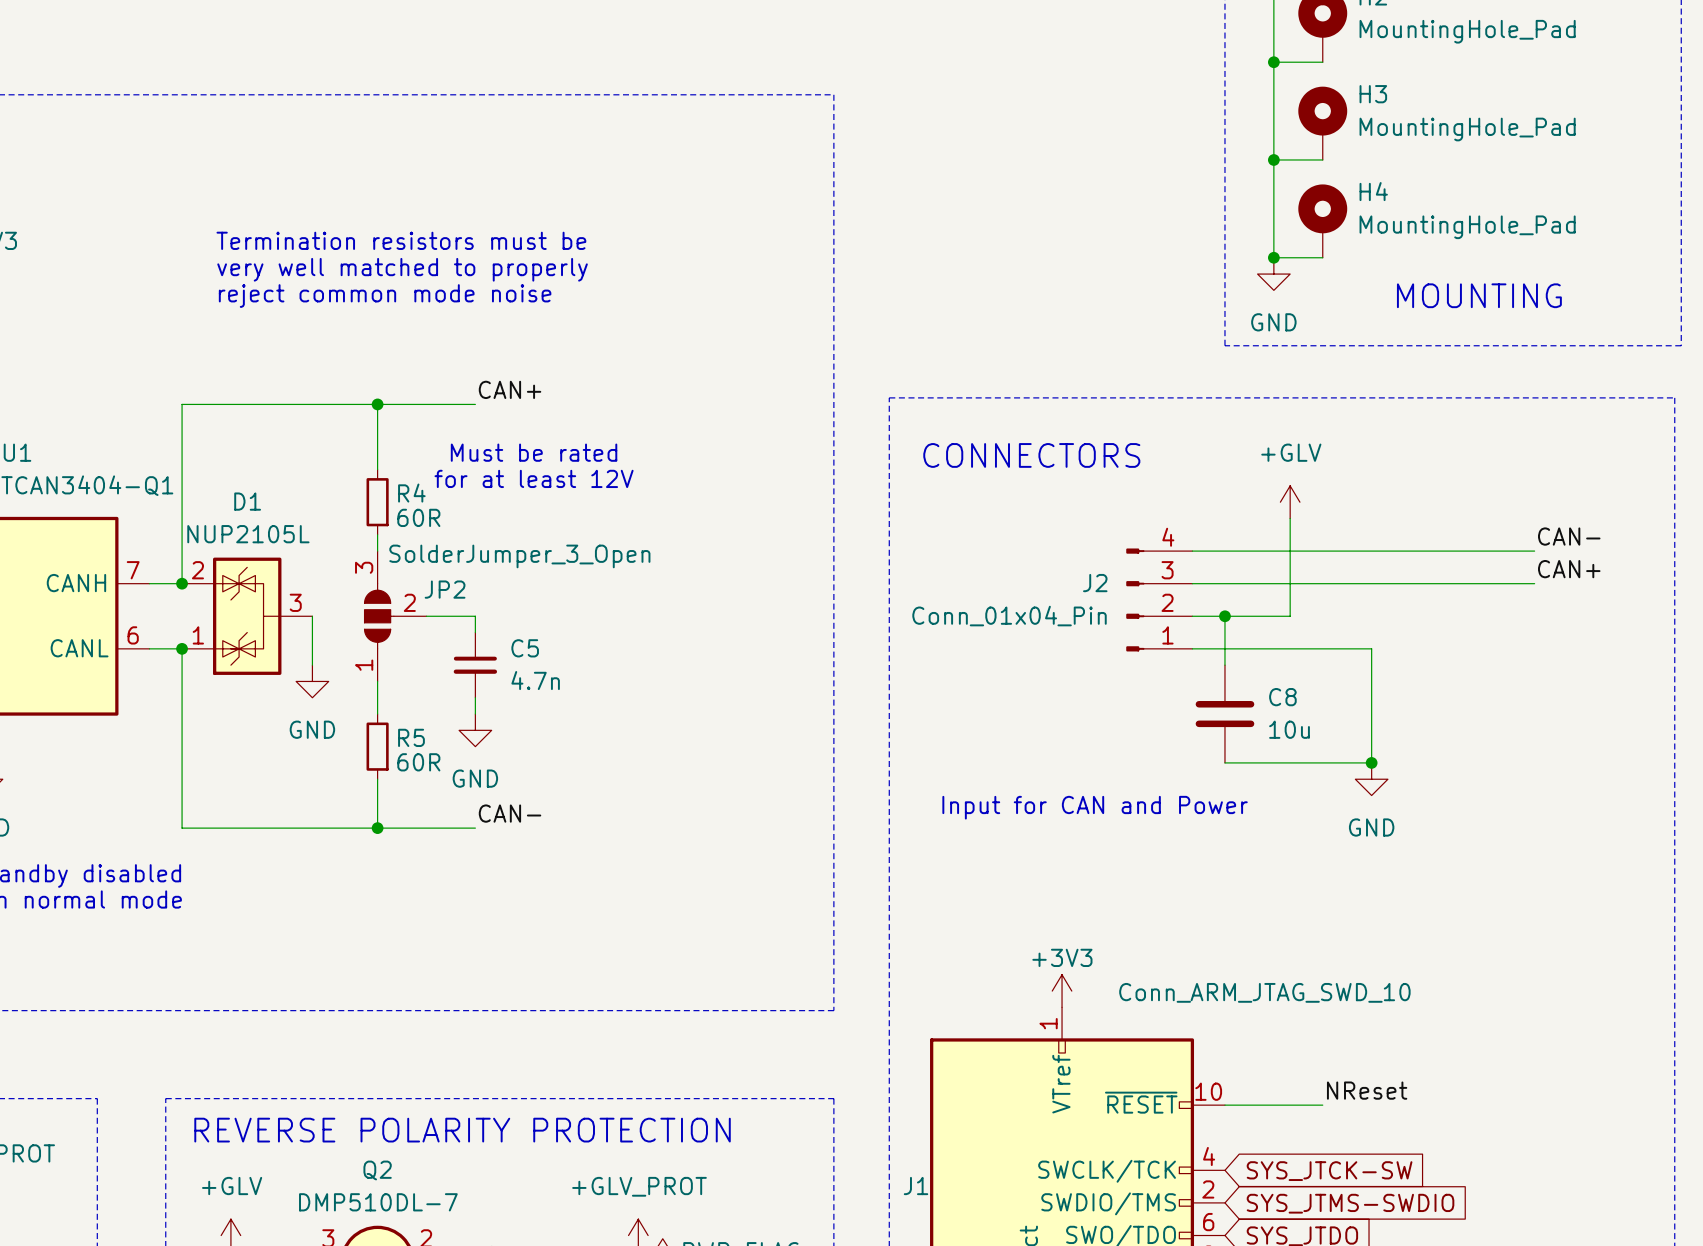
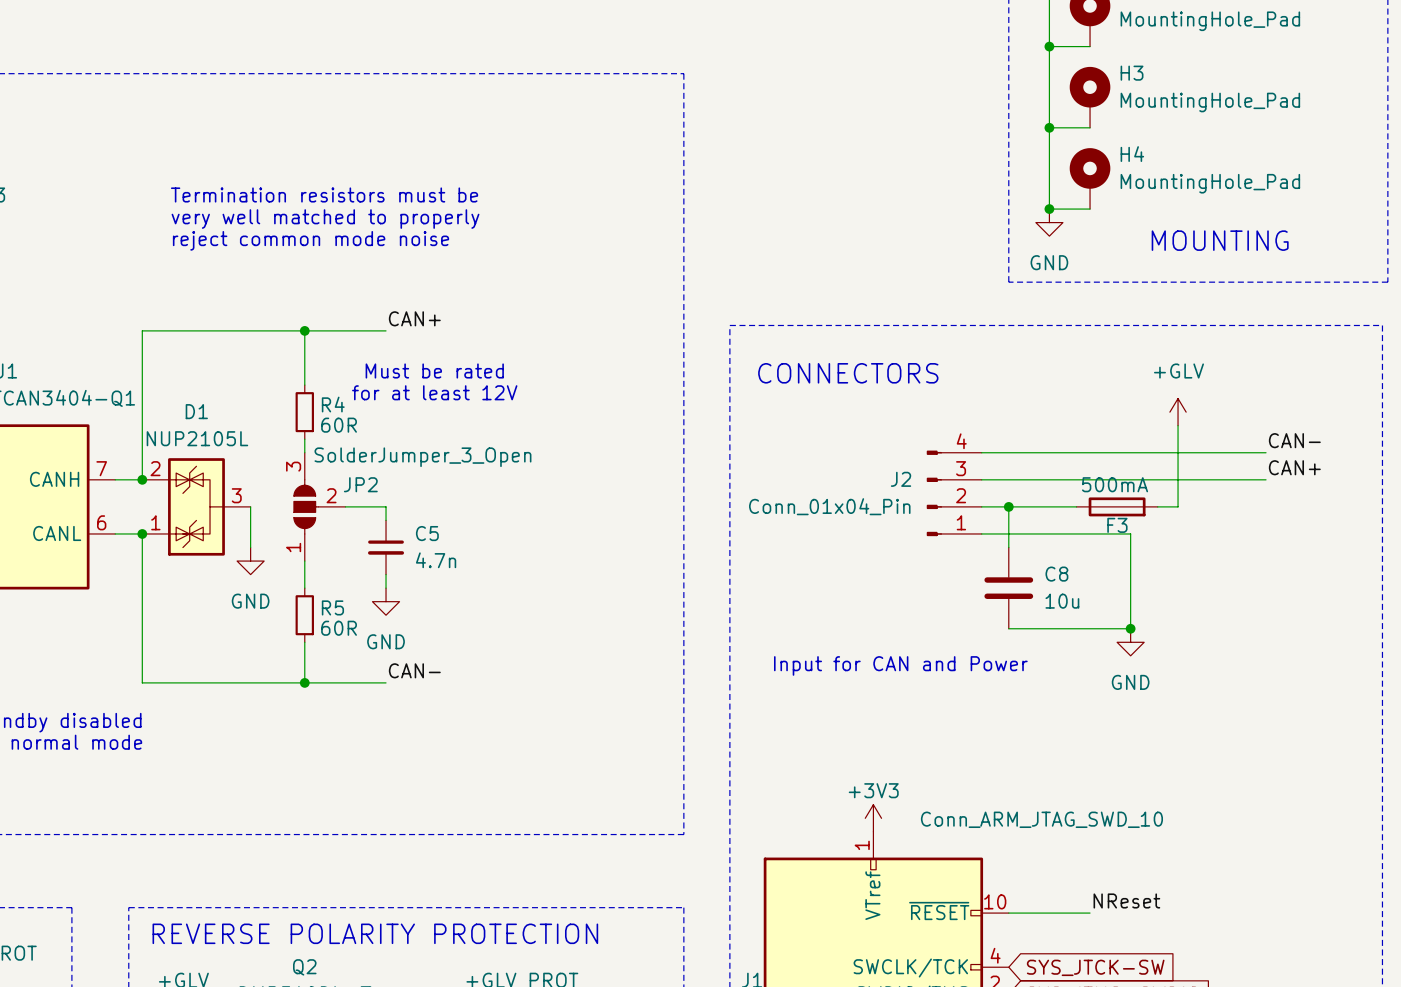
power symbol position: +GLV (1290, 502) -> +GLV (1178, 412)
wire: (1290, 518) (1290, 616) -> (1076, 506) (1062, 506)
wire: none -> (1178, 425) (1178, 506) (1157, 506)
F3: none -> 500mA (1117, 506)

